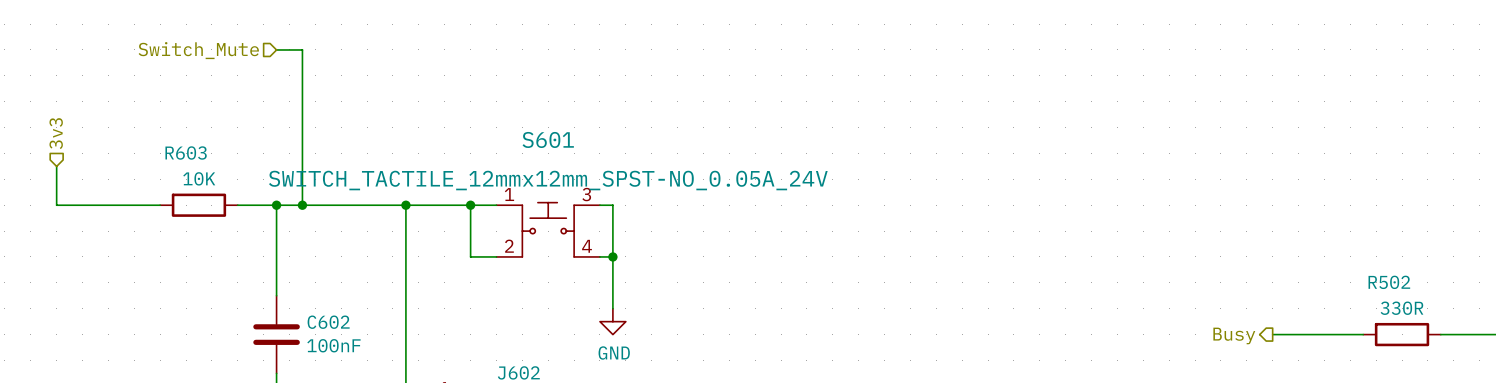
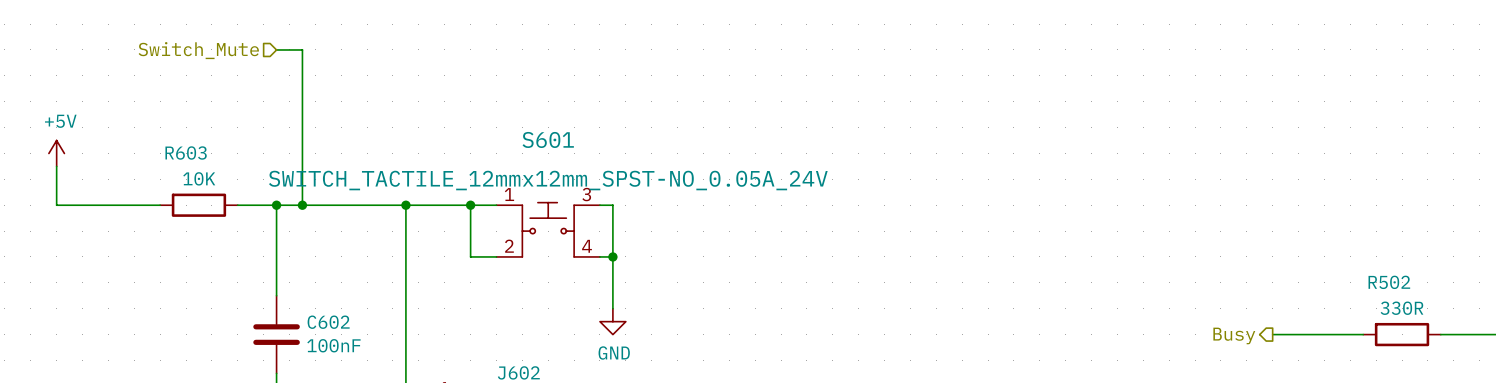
hierarchical label: 3v3 (56, 133) -> none
power symbol: none -> +5V (56, 153)

